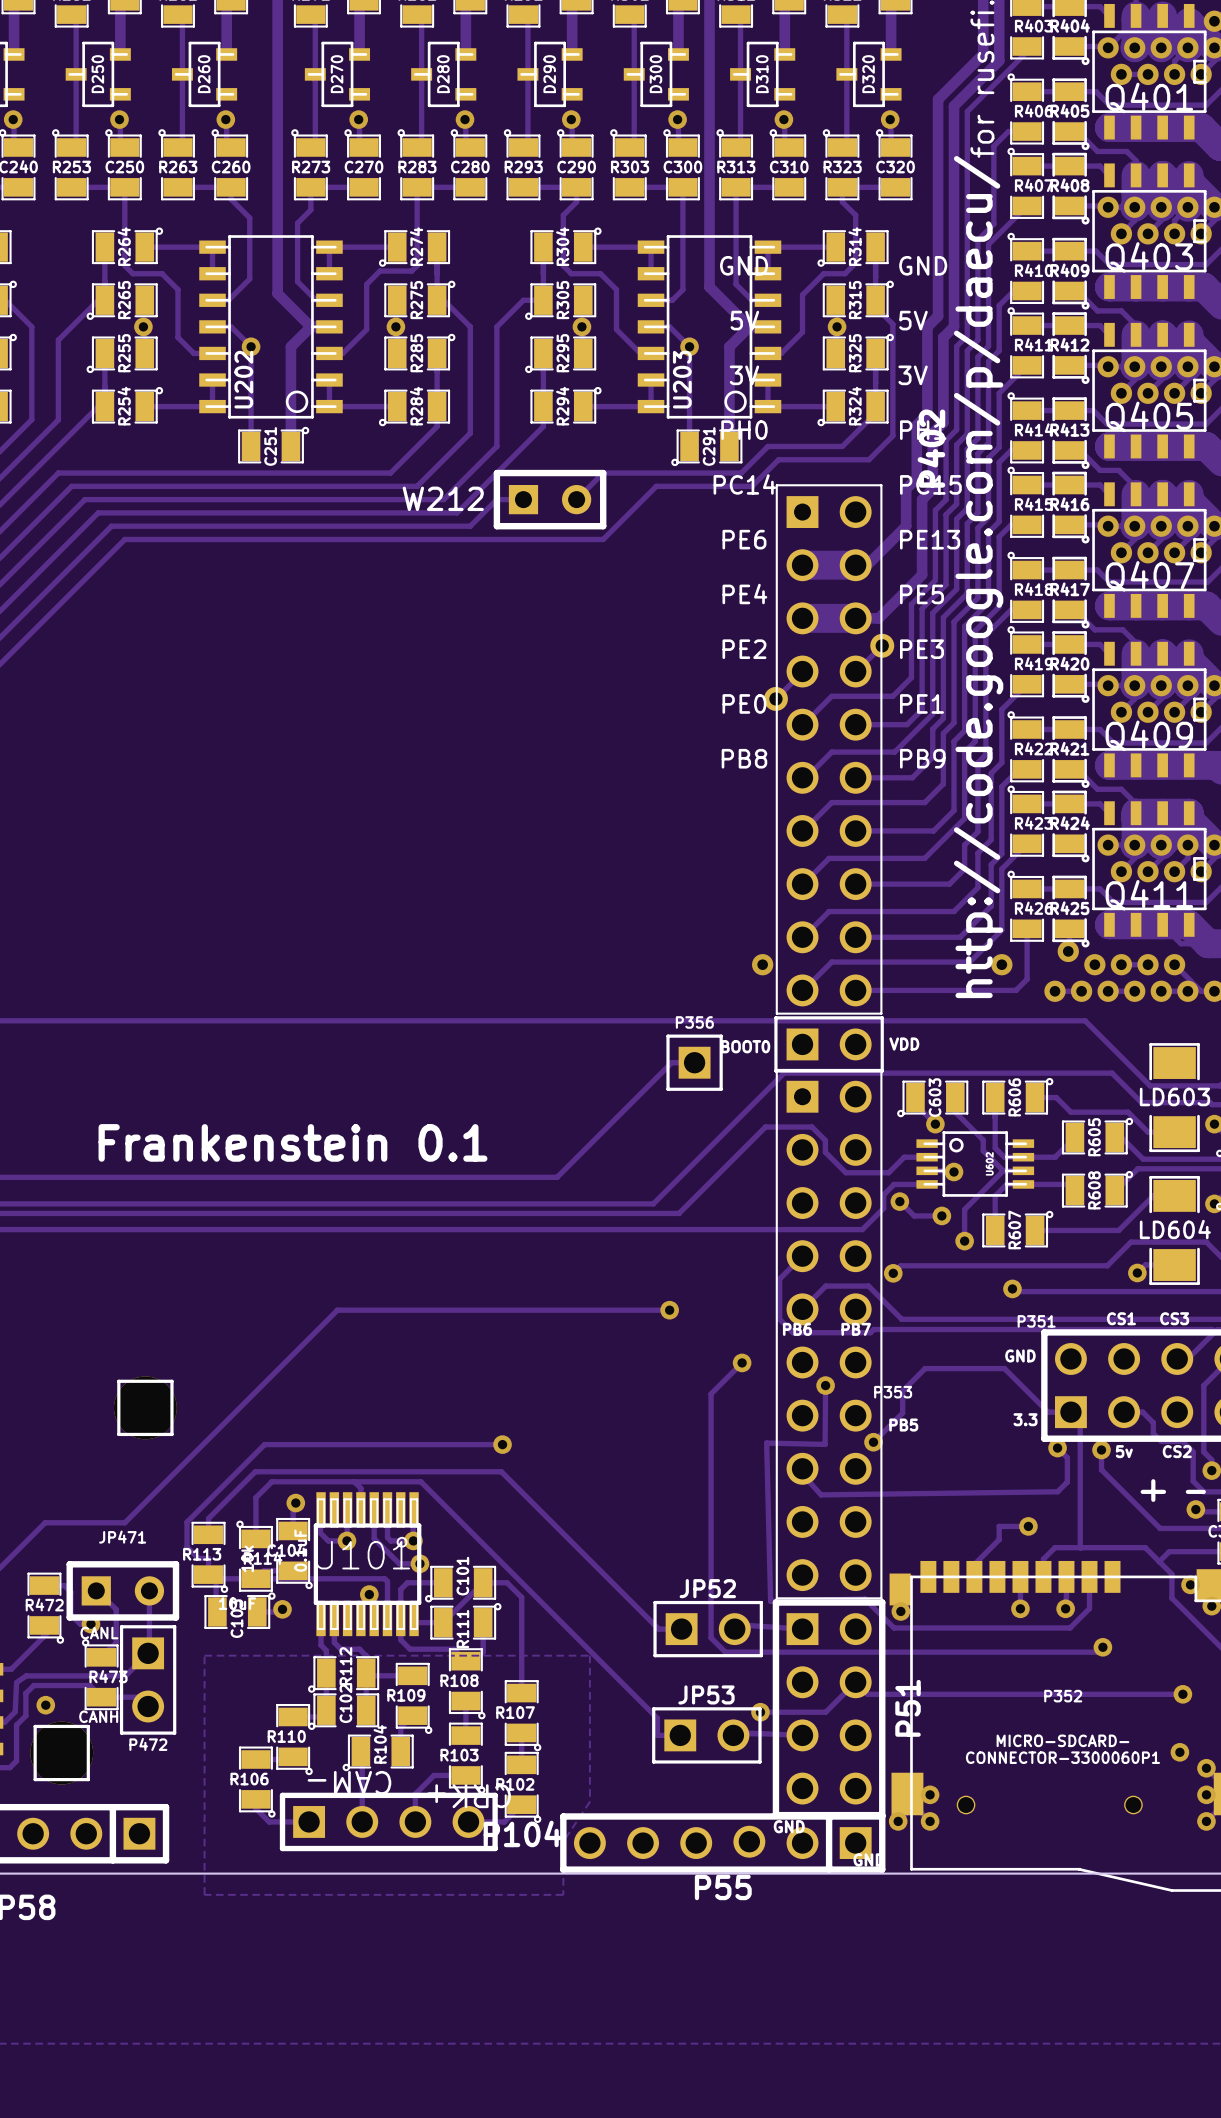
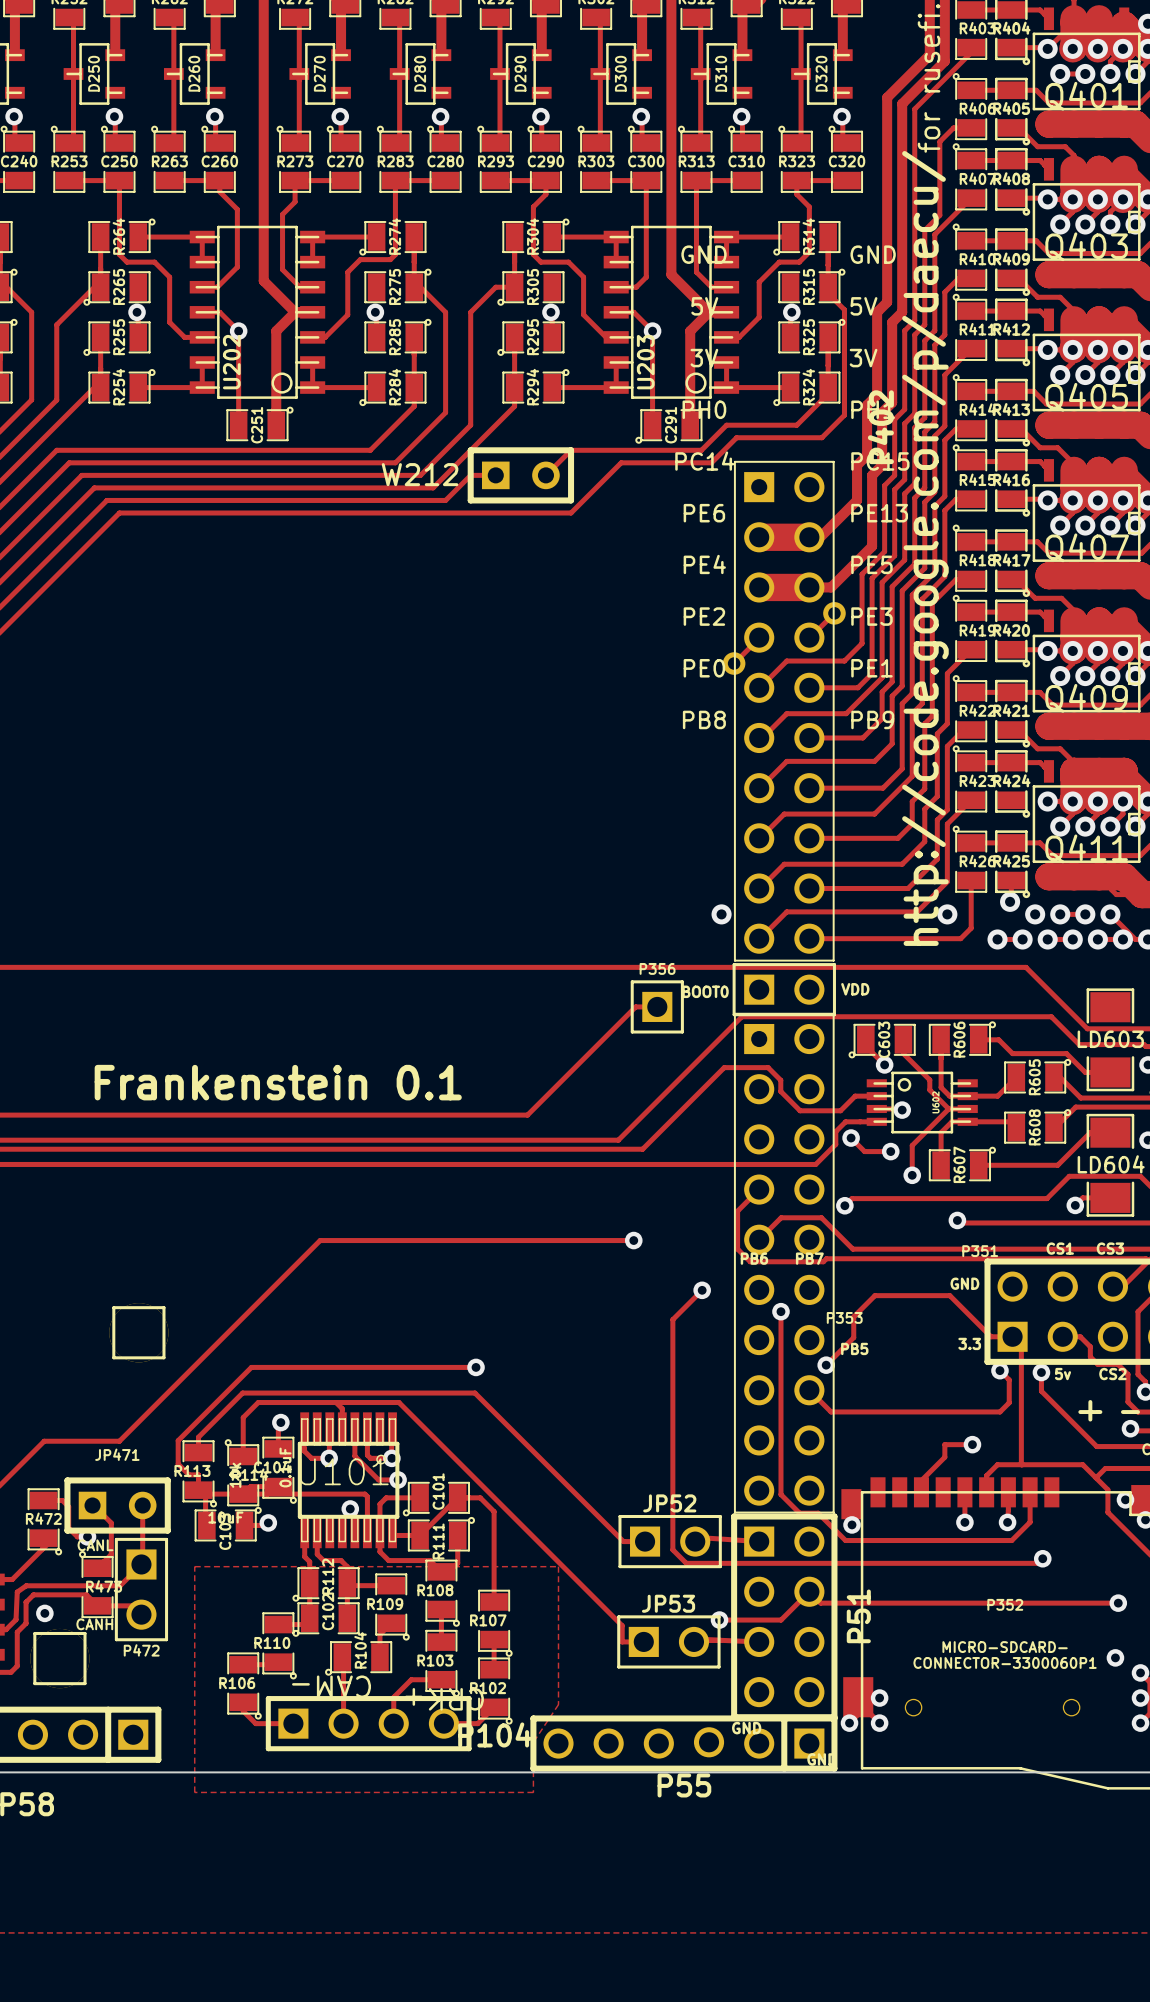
track: (825, 1385) (825, 1444) (766, 1443) (770, 1601) (865, 1599) -> (780, 1311) (780, 1494) (799, 1513) (818, 1513)
track: (799, 1471) (821, 1494) (1057, 1491) -> (809, 1390) (831, 1411) (1000, 1411)

